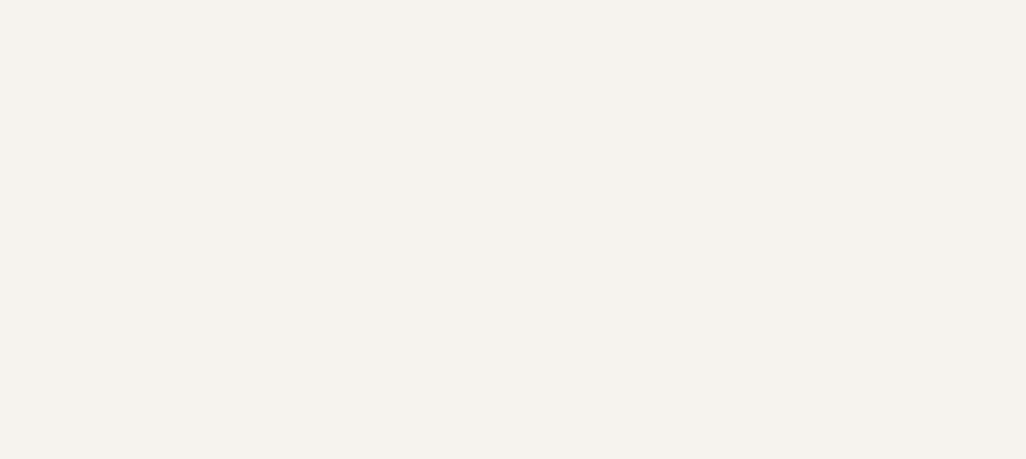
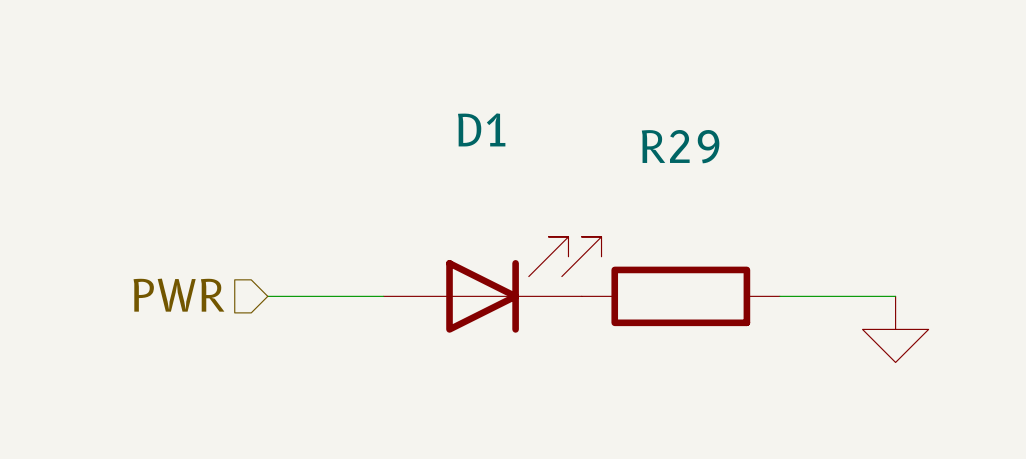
D1: none -> (492, 284)
hierarchical label: none -> PWR (178, 295)
wire: none -> (267, 296) (383, 296)
R29: none -> (680, 296)
wire: none -> (779, 296) (895, 296)
power symbol: none -> (895, 329)

